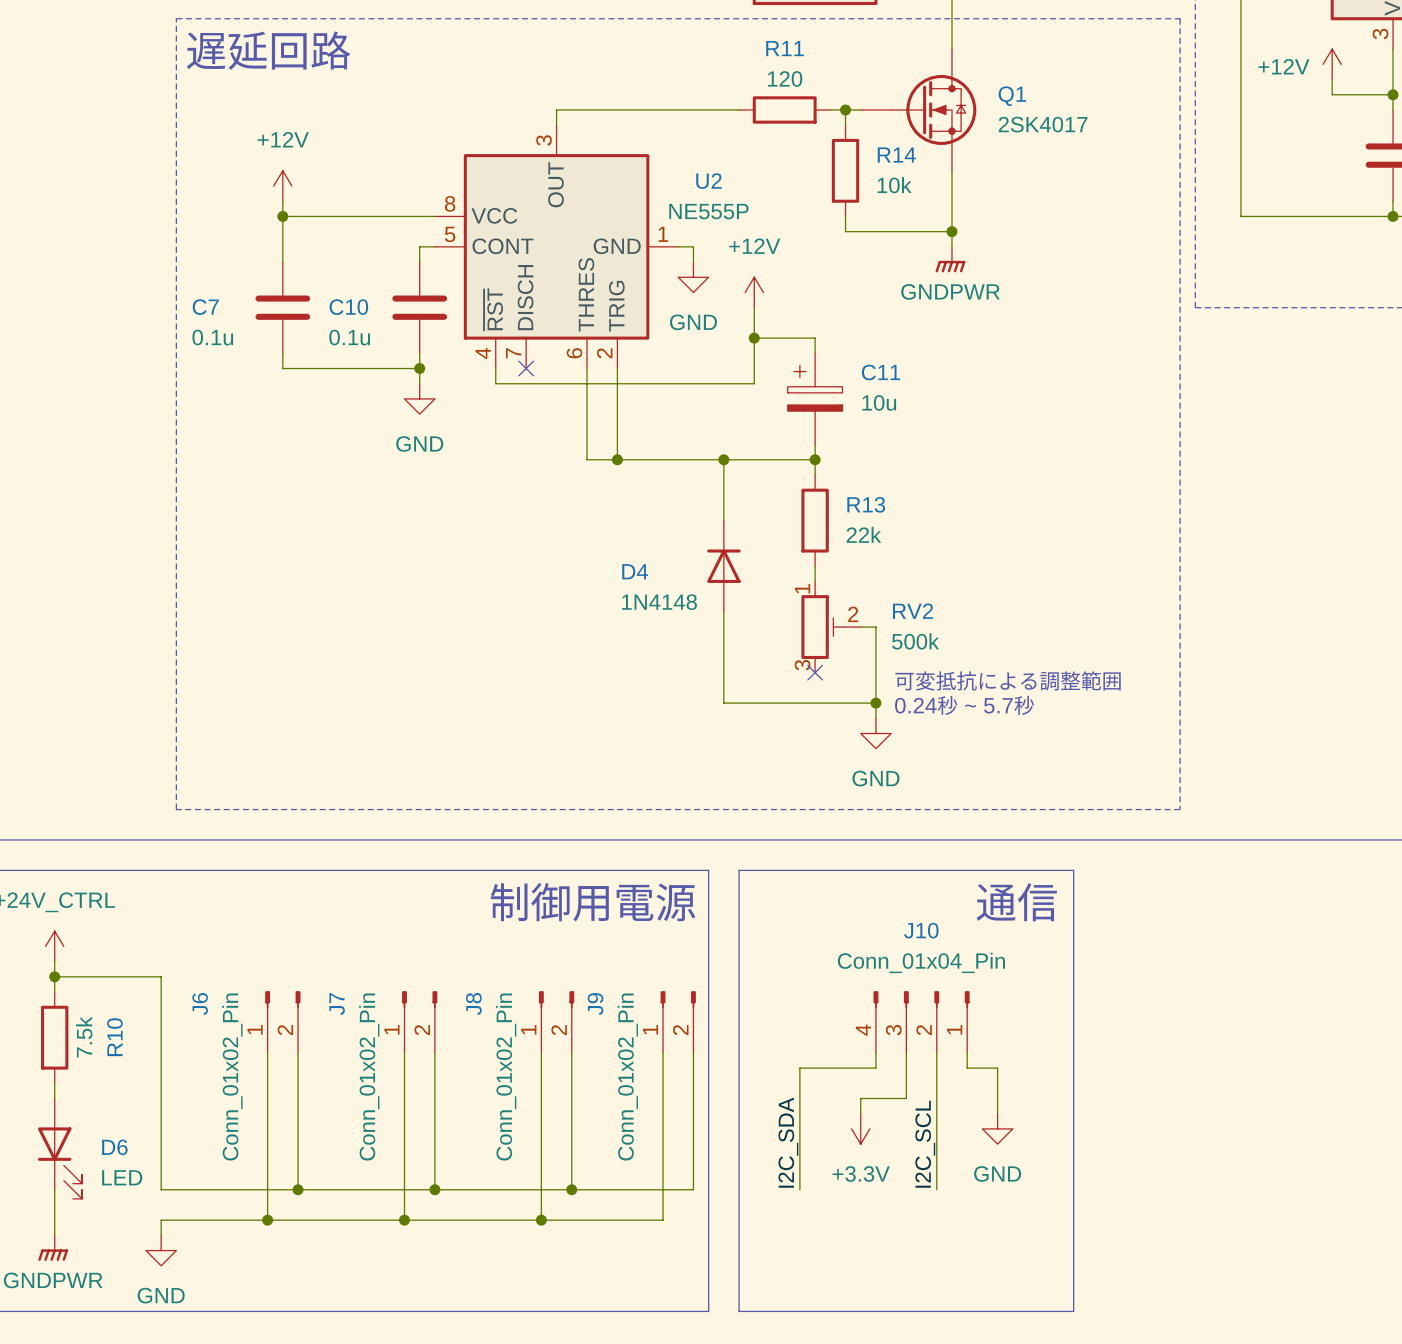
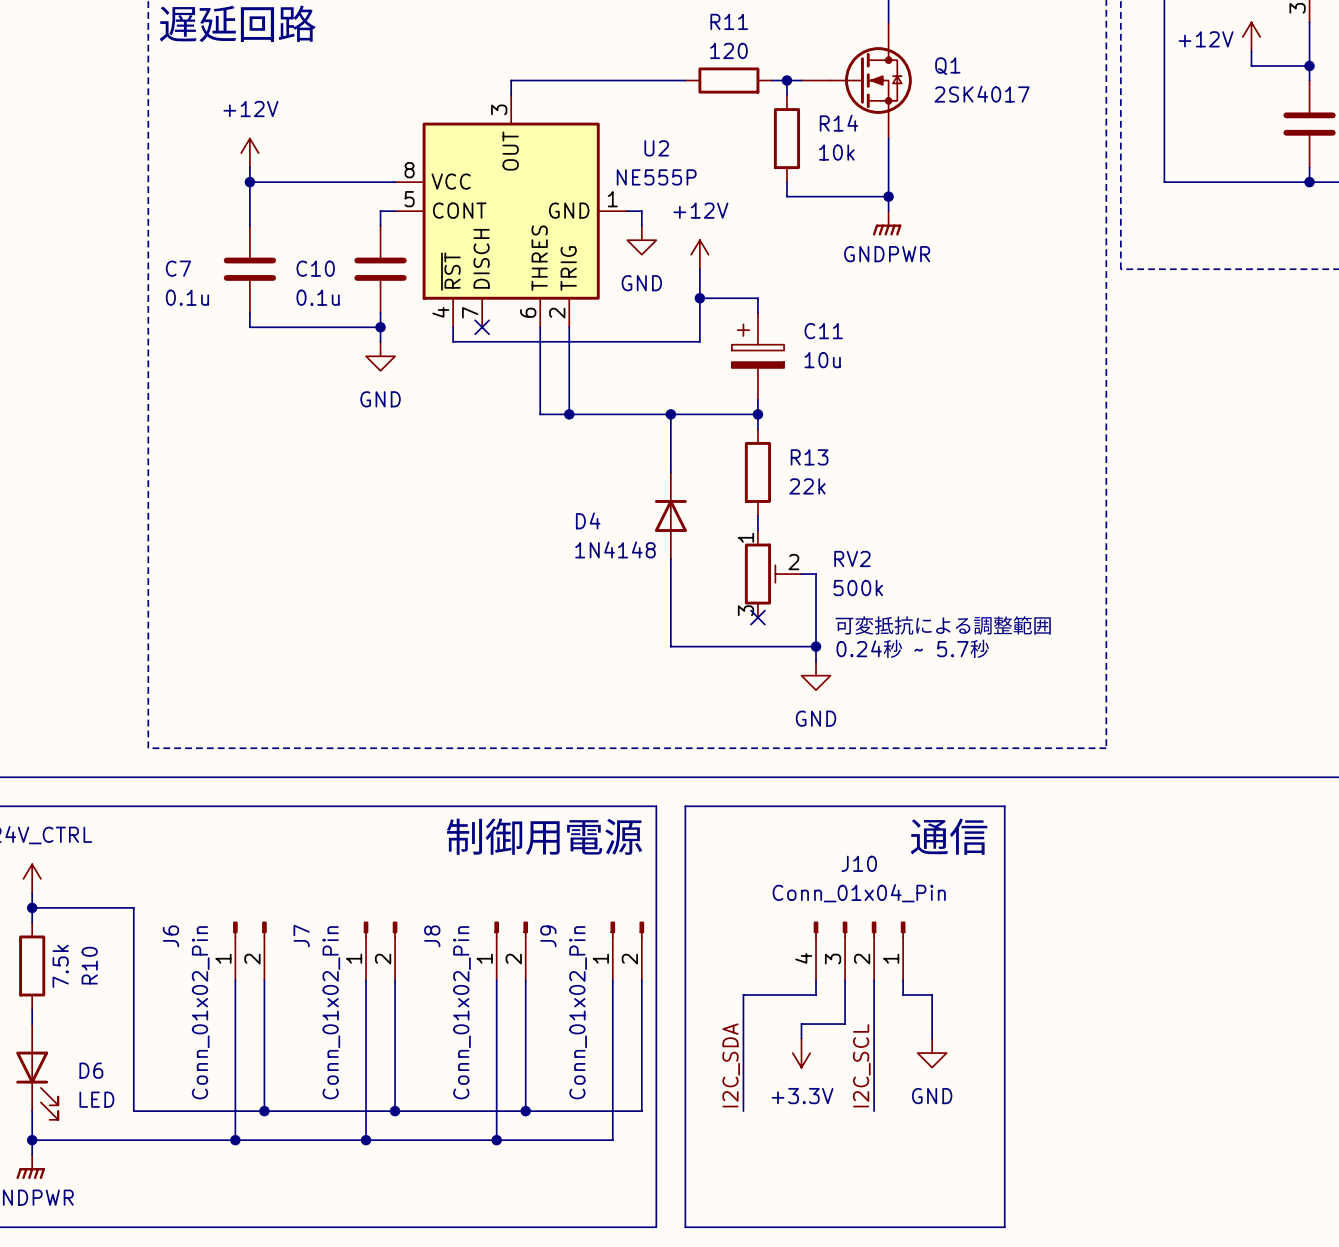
junction: none -> (32, 1140)
wire: (161, 1220) (161, 1235) -> (133, 1140) (32, 1140)
power symbol: GND (161, 1250) -> none

